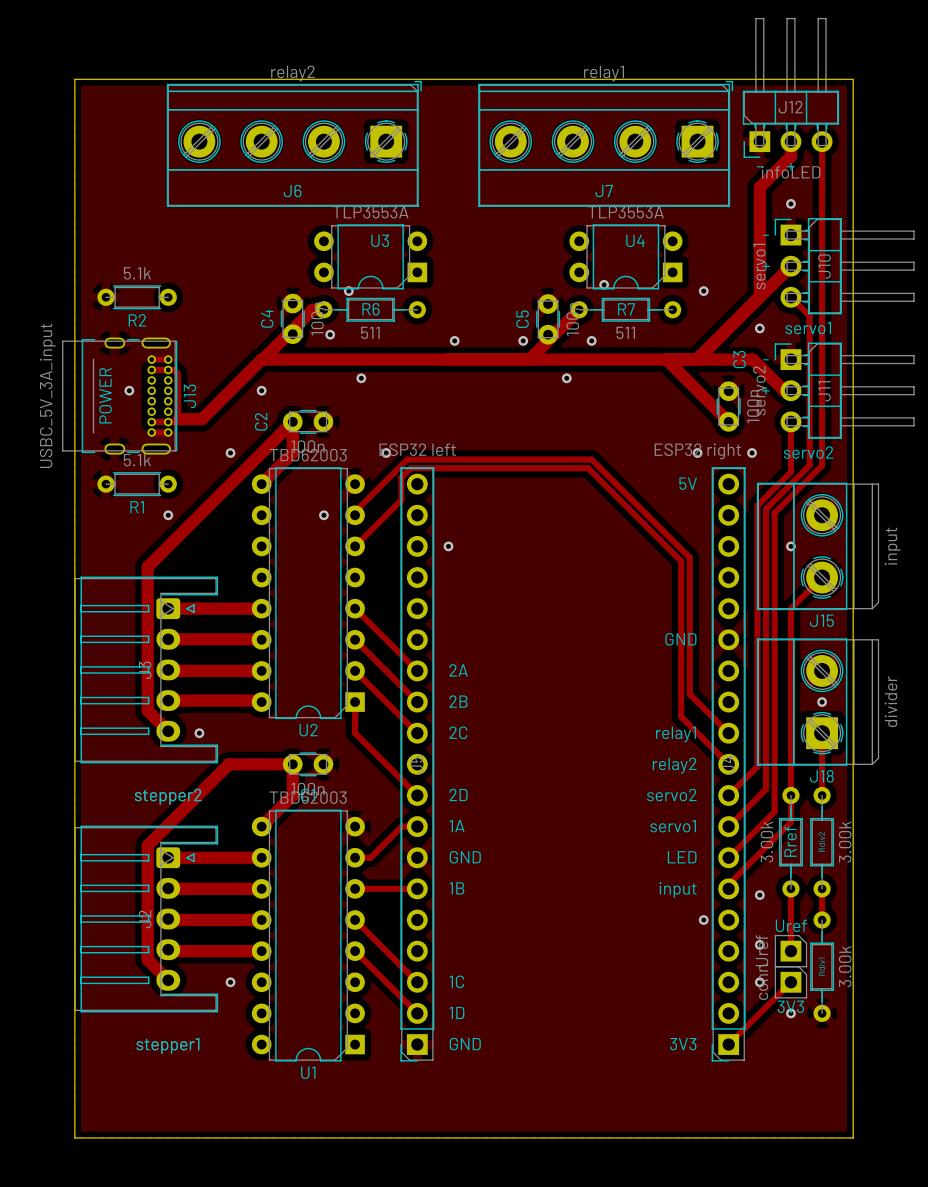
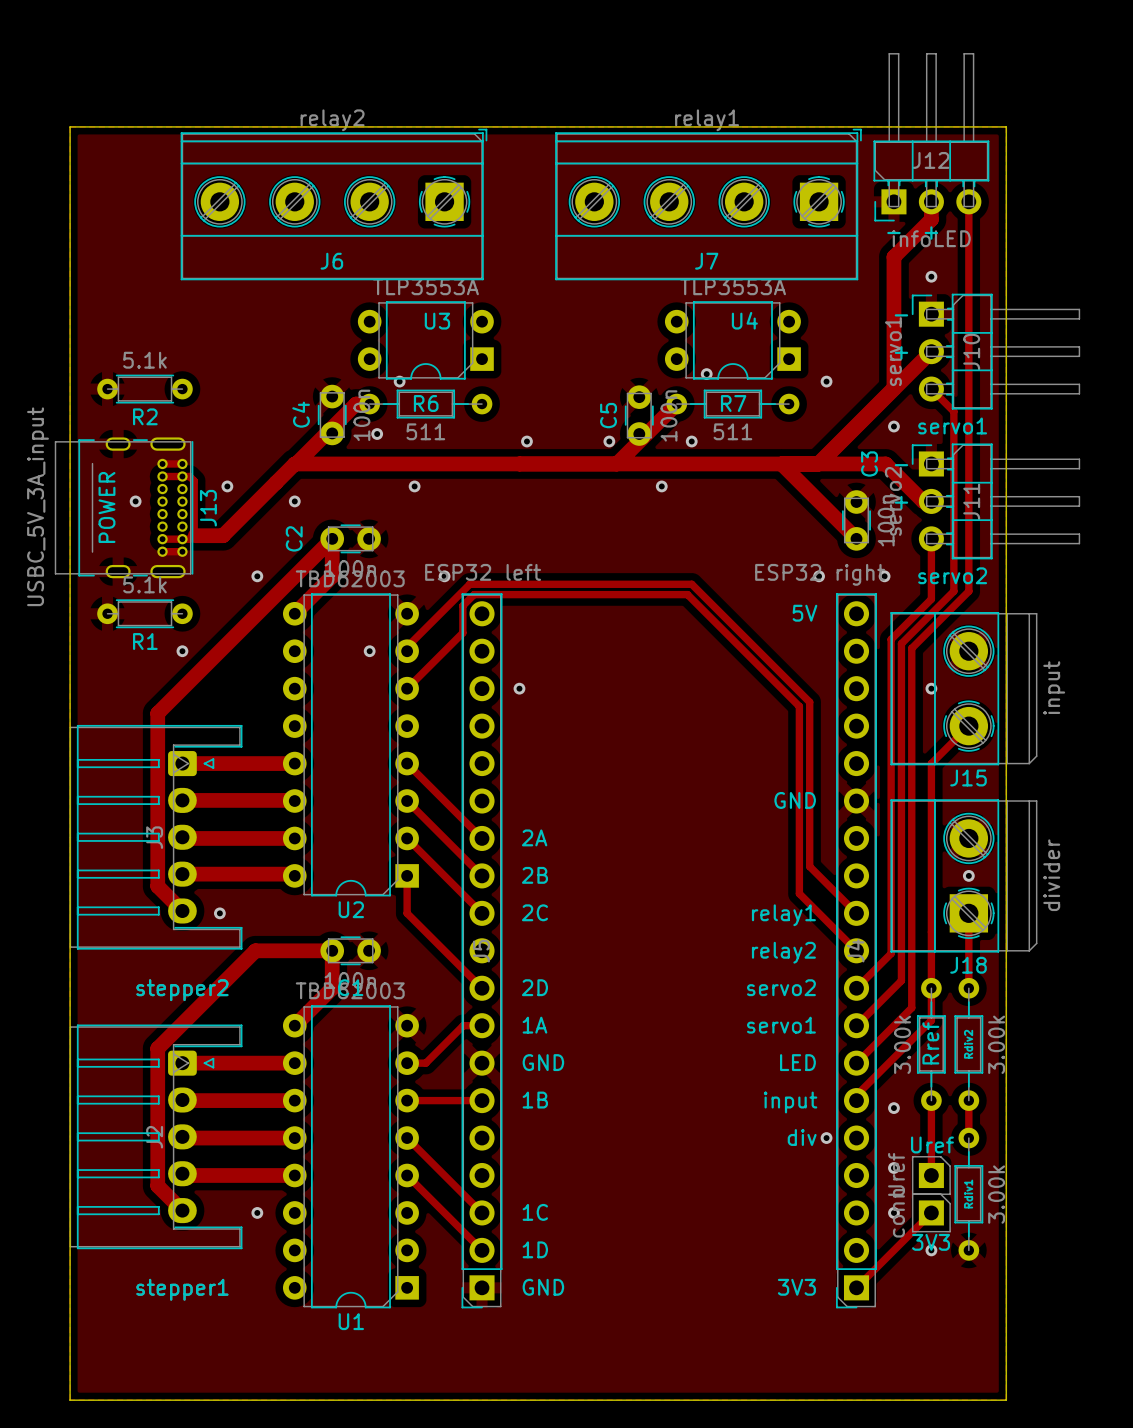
via: none -> (227, 486)
text: none -> div (802, 1137)

